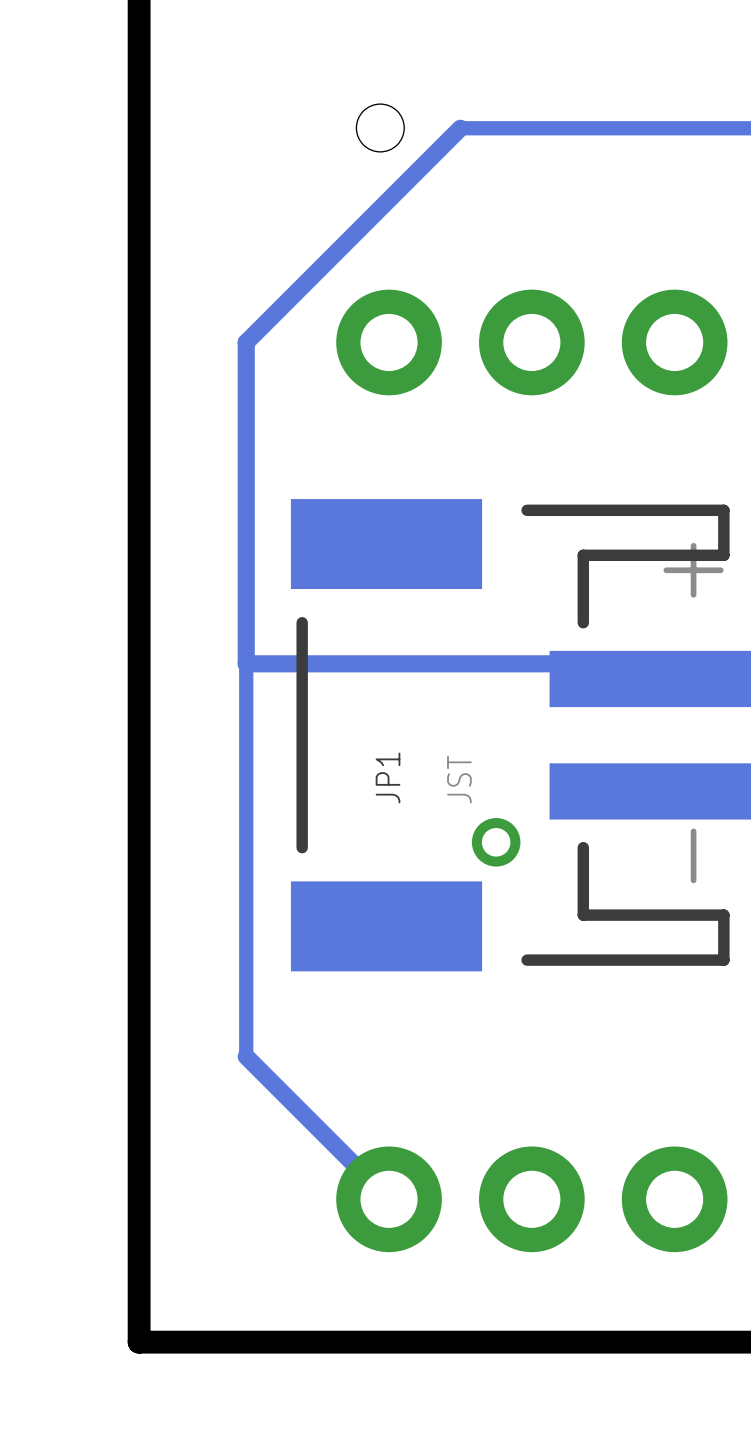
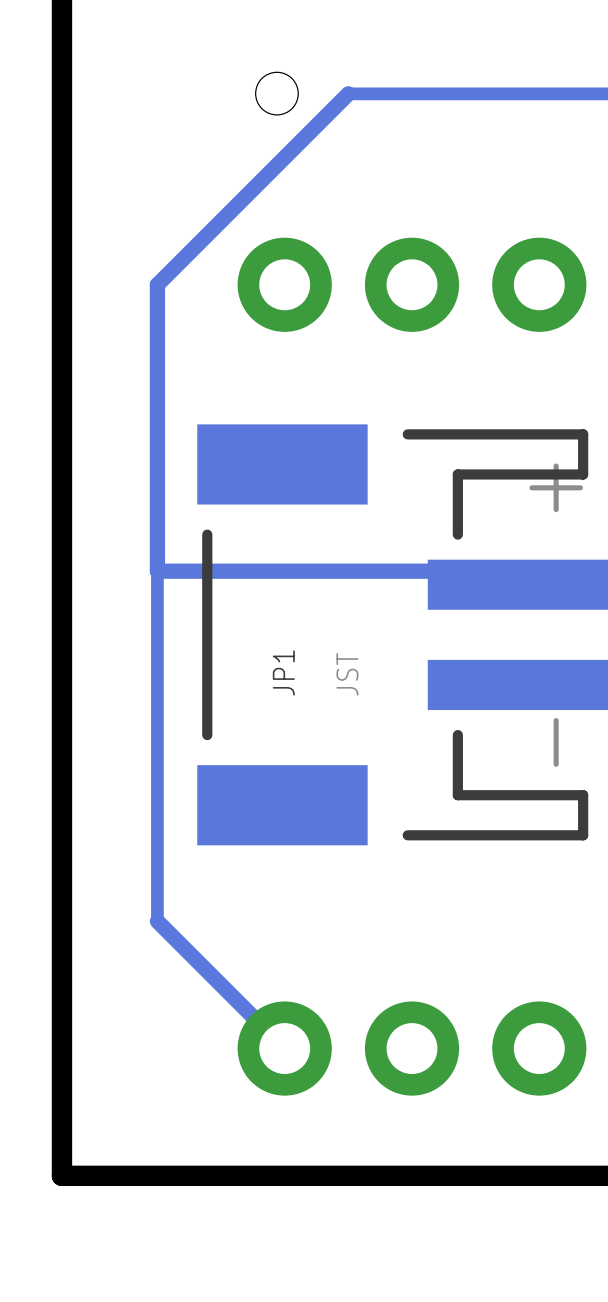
via: (496, 842) -> none

